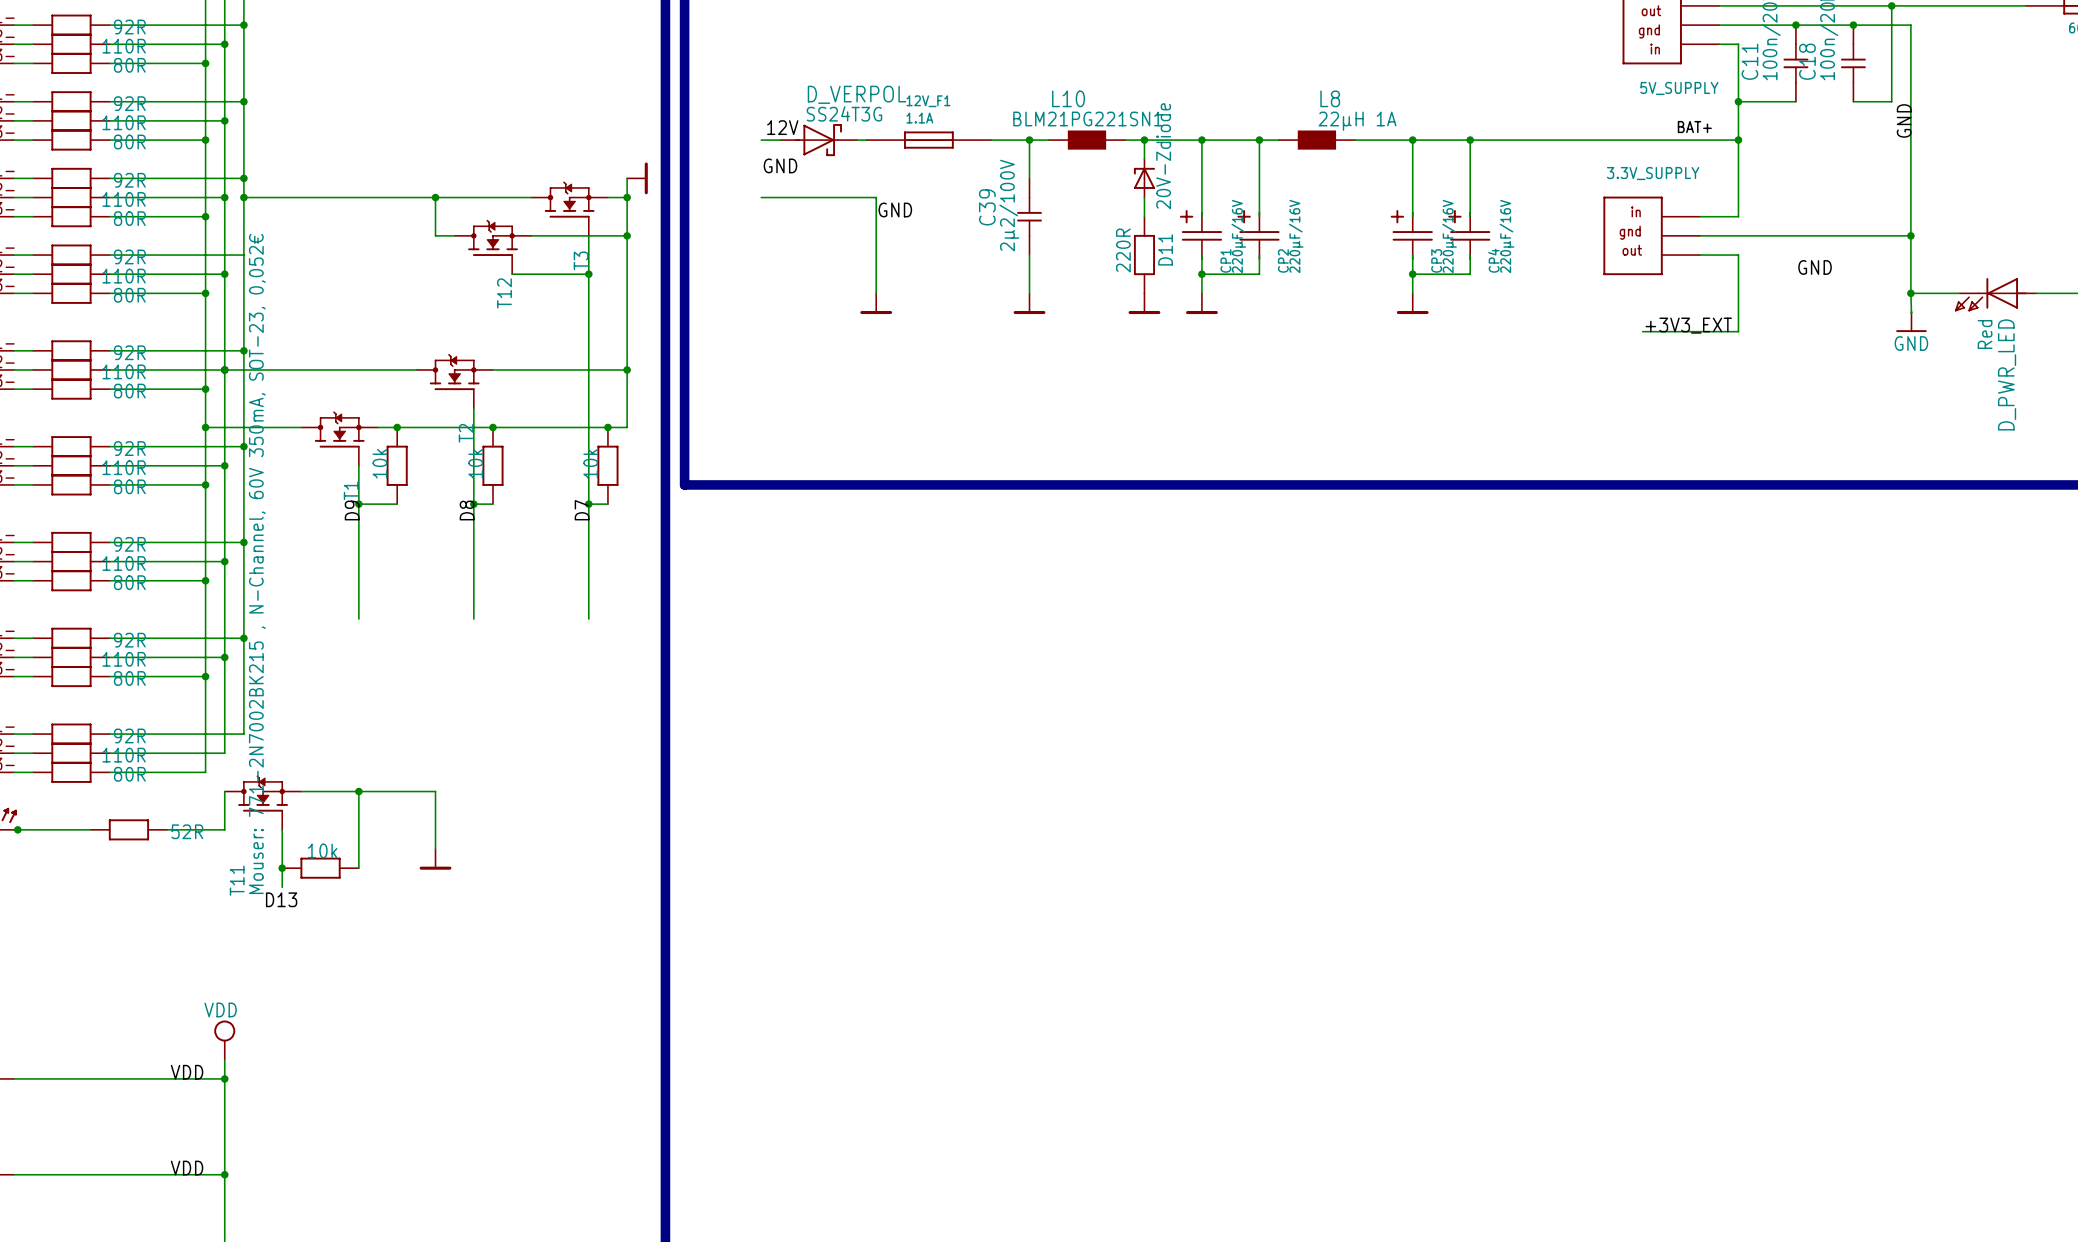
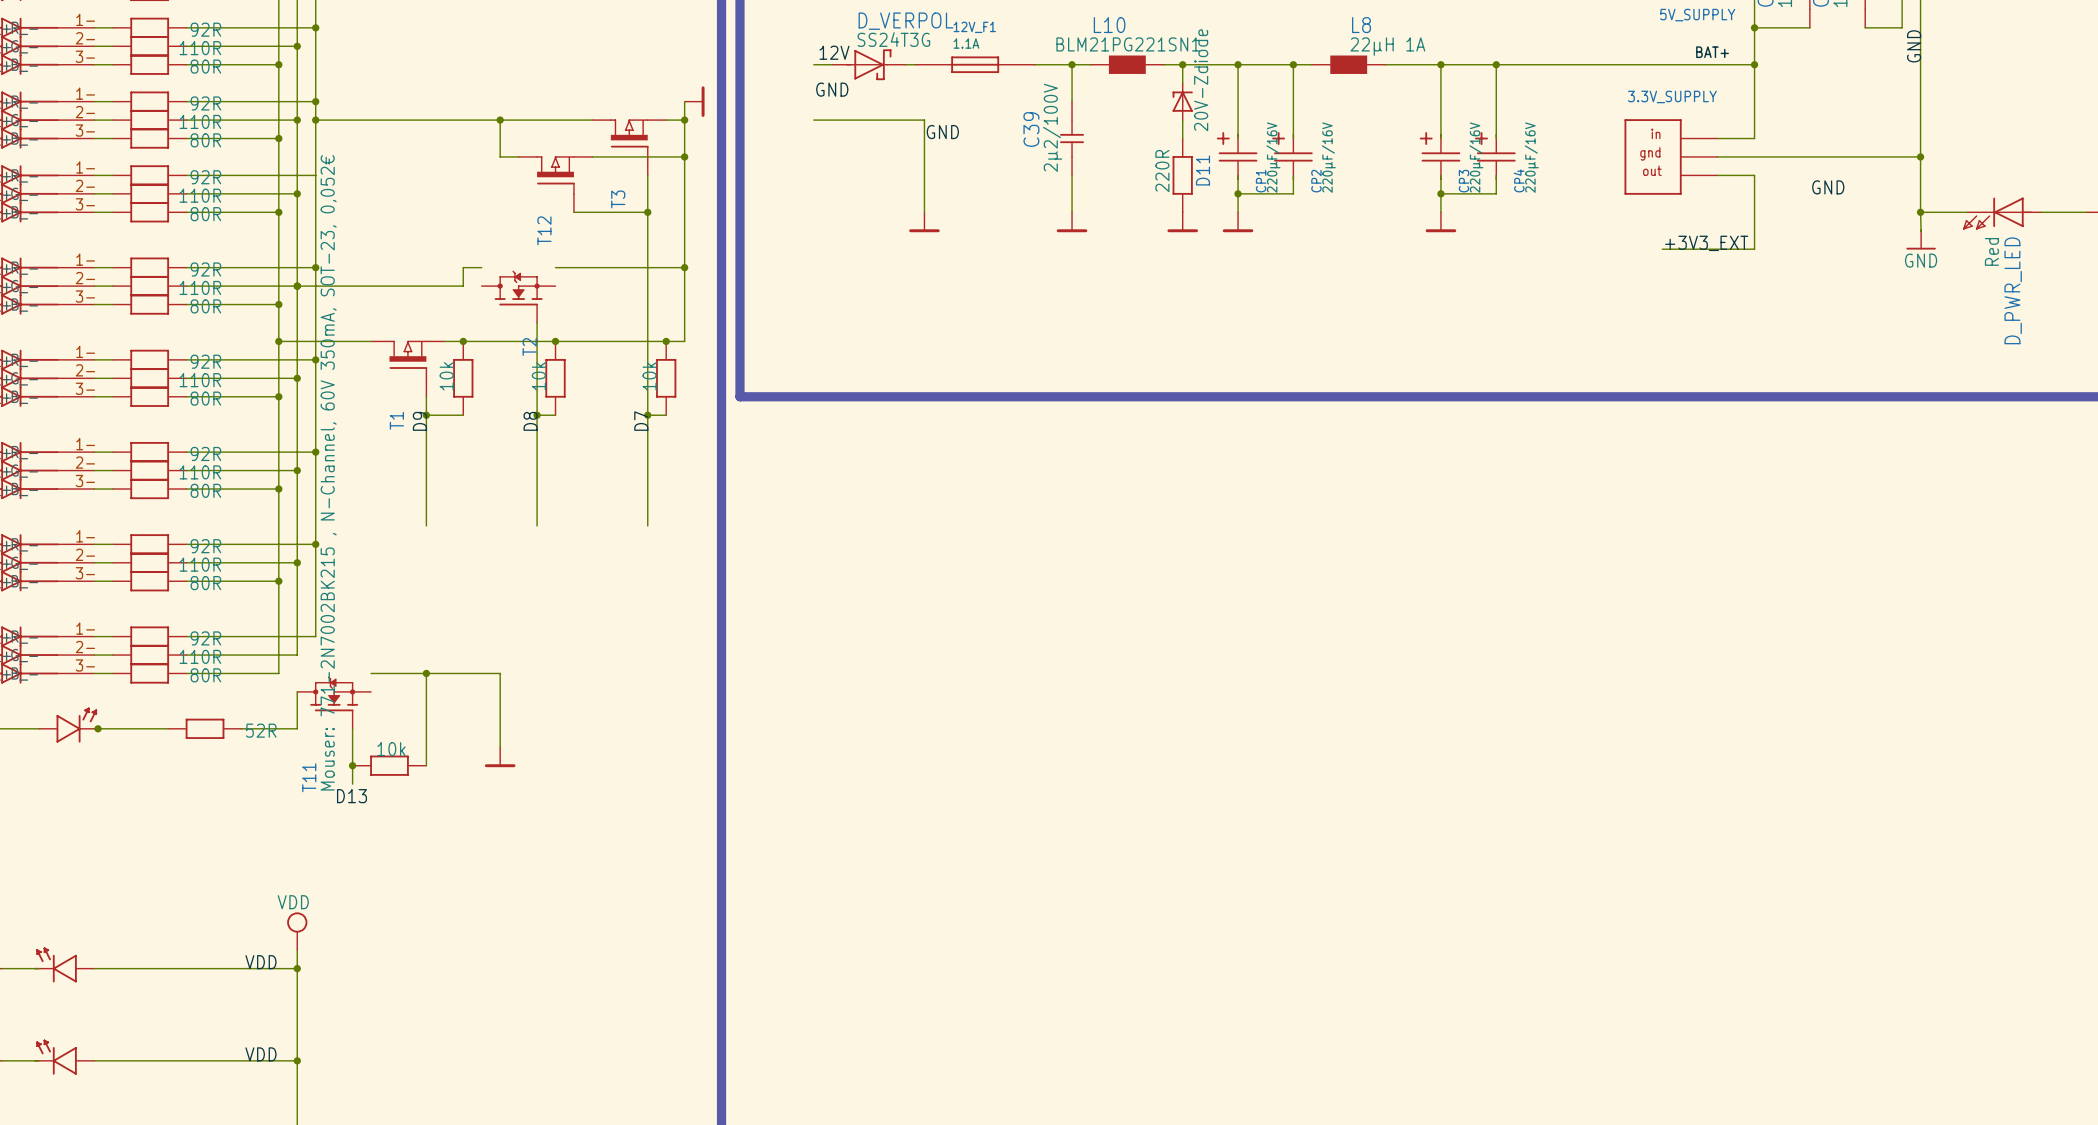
T3 symbol: [531, 181, 608, 236] -> [592, 119, 667, 176]
T12 symbol: [454, 219, 532, 275] -> [518, 156, 593, 213]
T3 name position: T3 (581, 260) -> T3 (618, 199)
wire: (512, 274) (588, 274) -> (573, 212) (647, 212)
junction position: (588, 274) -> (647, 212)
T12 name position: T12 (504, 293) -> T12 (544, 230)
wire: (397, 369) (416, 369) -> (463, 286) (463, 267) (481, 267)
wire: (492, 369) (627, 369) -> (555, 267) (684, 267)
junction position: (627, 369) -> (684, 267)
T1 symbol: [301, 411, 379, 466] -> [371, 340, 445, 397]
T1 name position: T1 (351, 490) -> T1 (396, 420)
wire: none -> (426, 673) (426, 691)
wire: (301, 791) (435, 791) -> (371, 673) (500, 673) (500, 691)
junction position: (358, 791) -> (426, 673)

